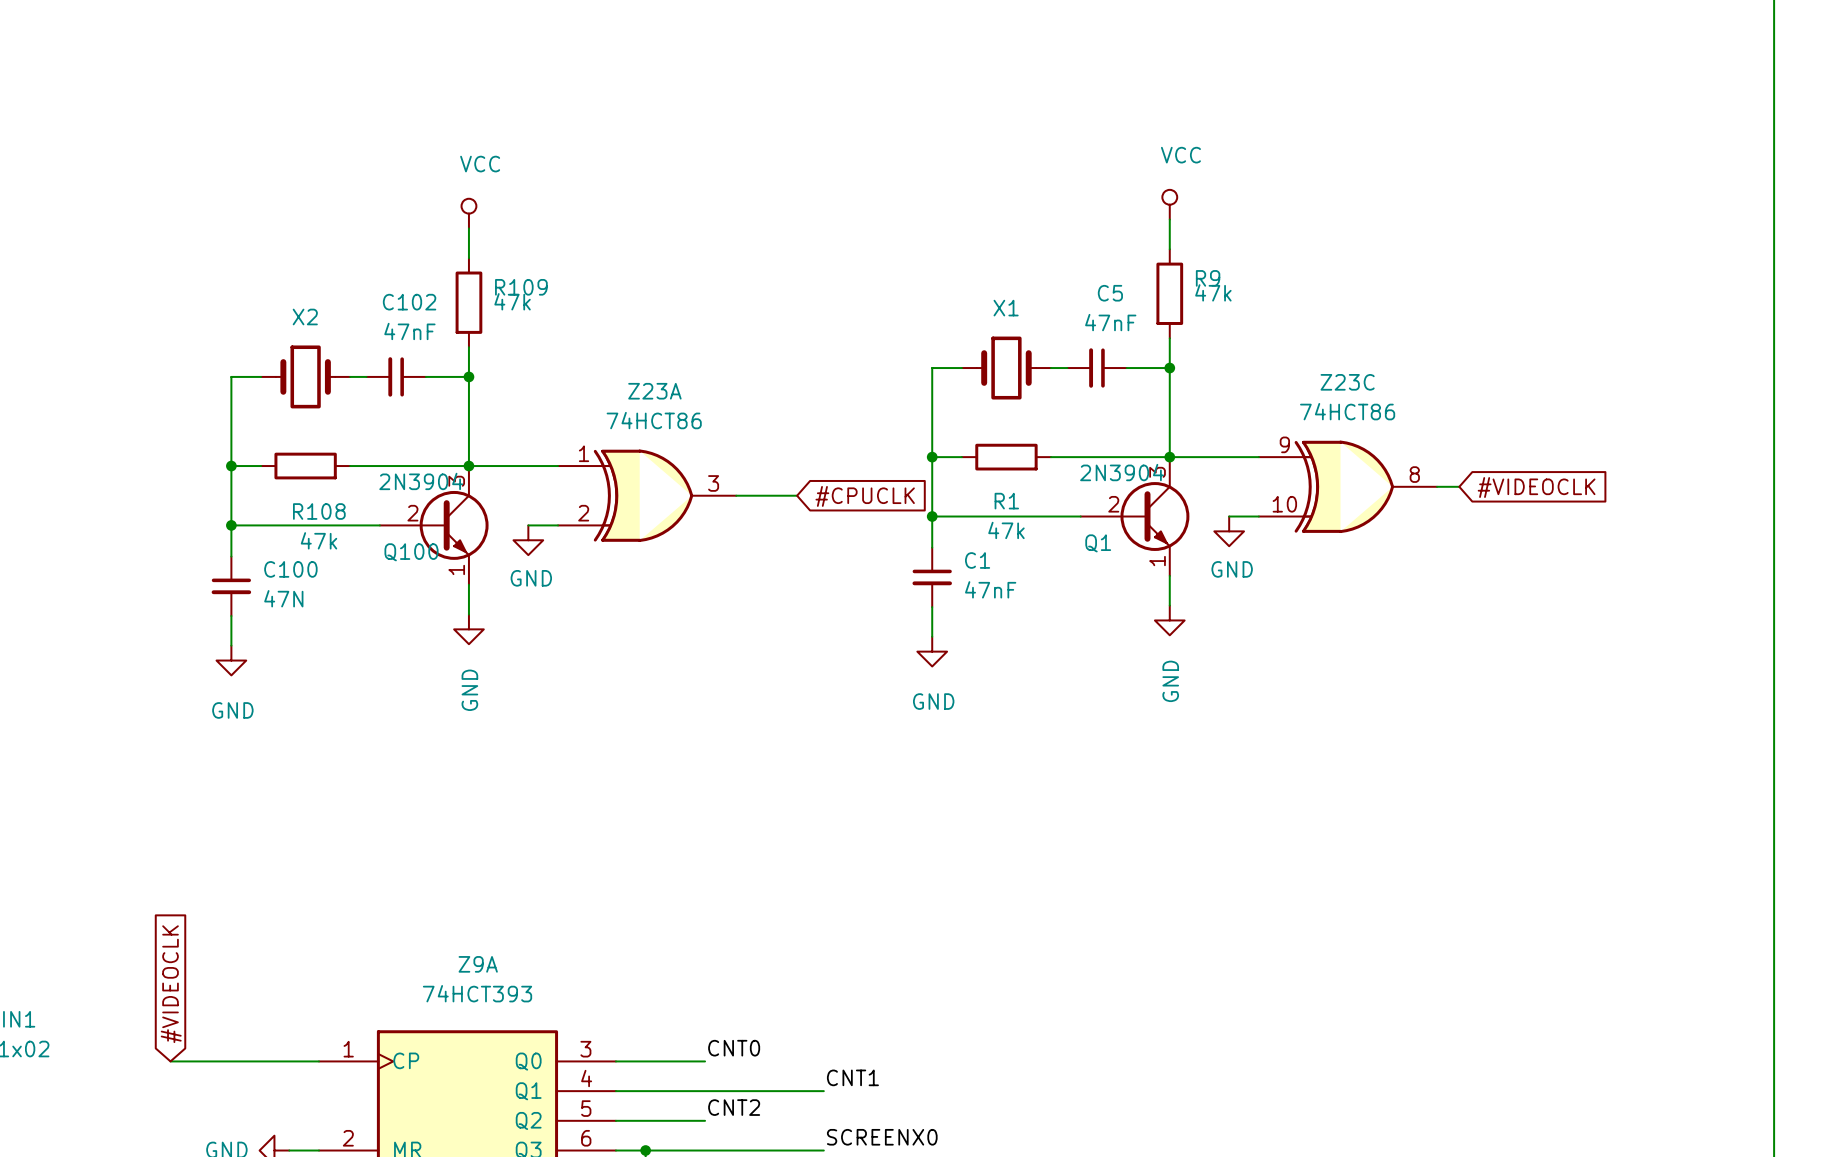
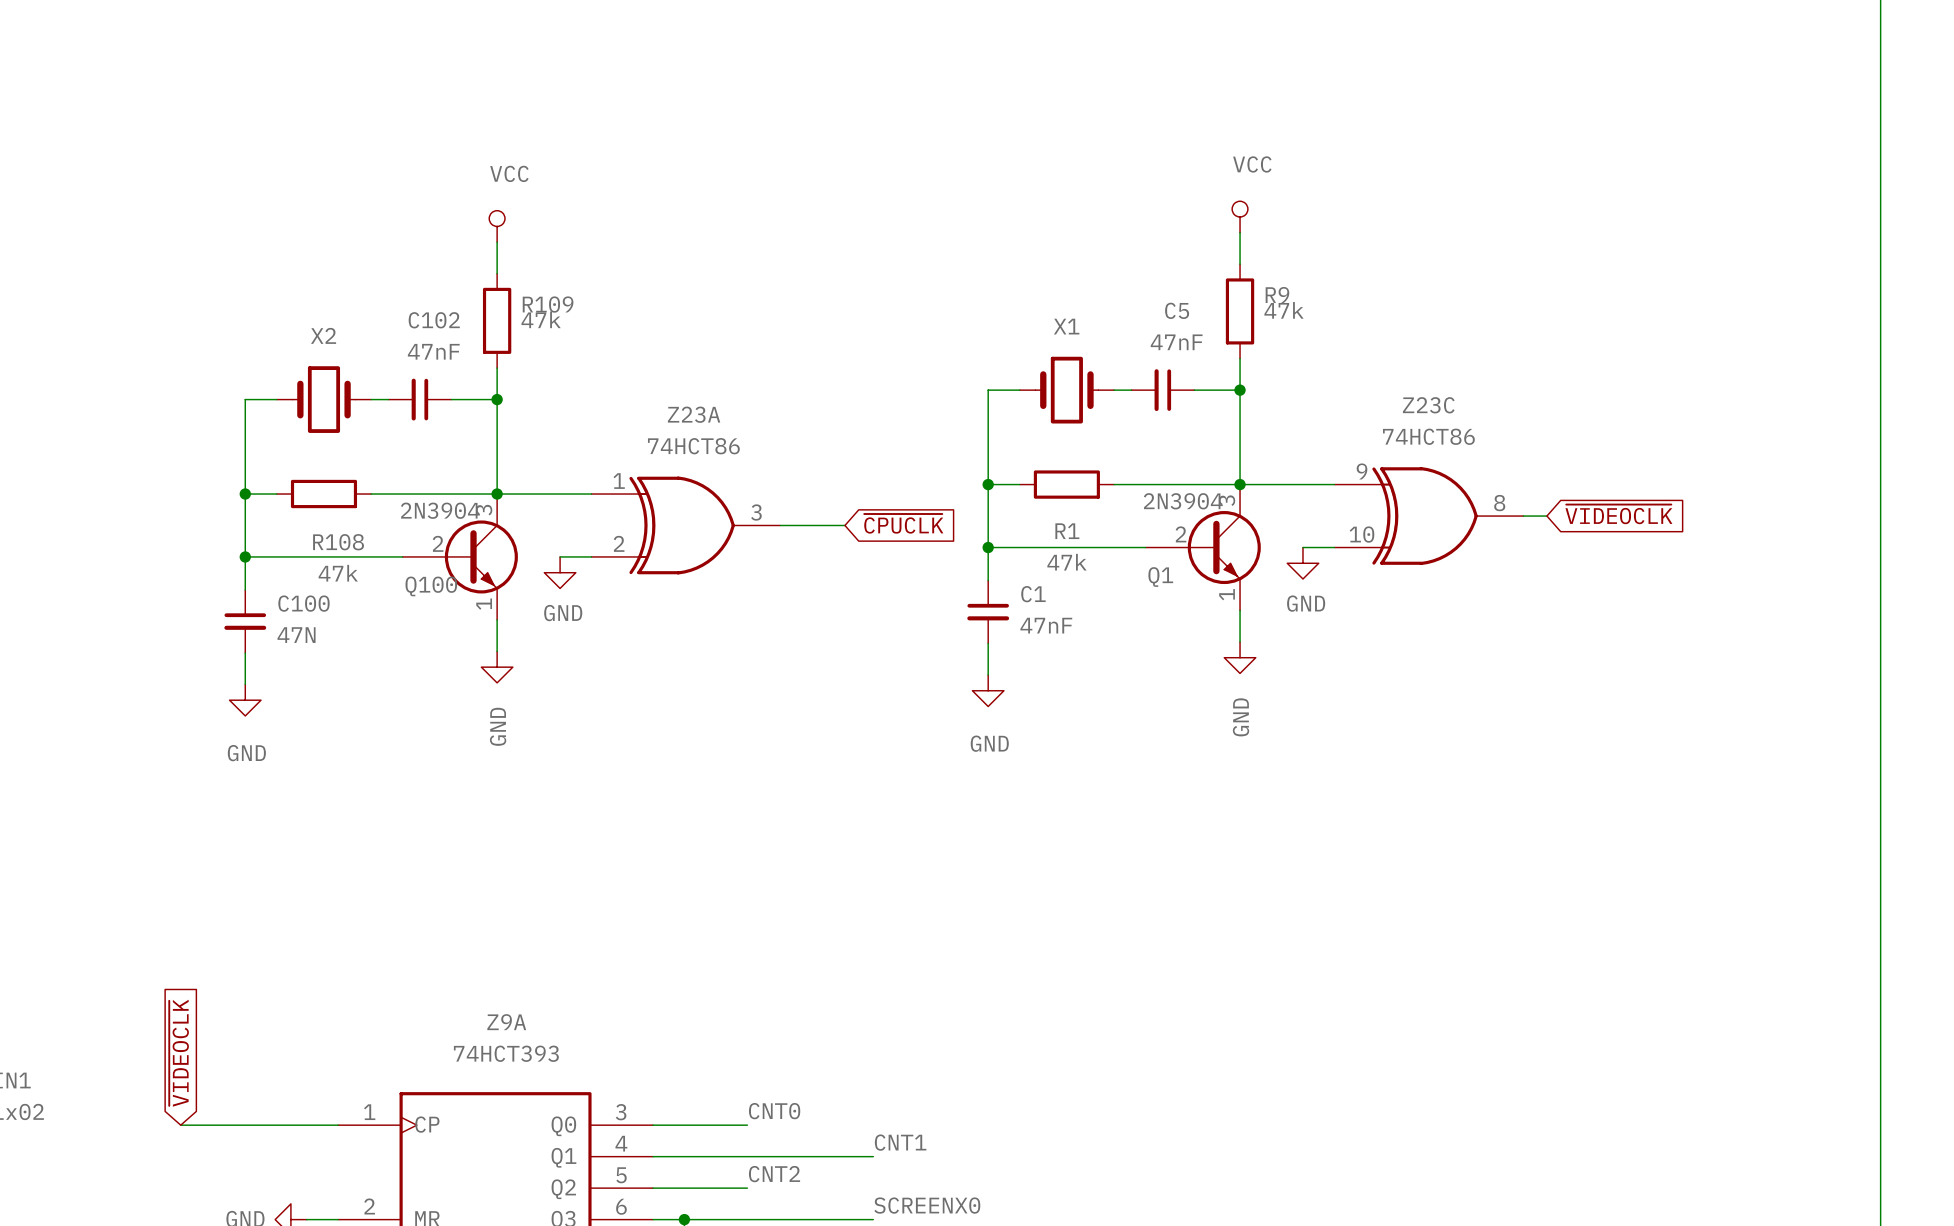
global label: #VIDEOCLK (1536, 487) -> ~{VIDEOCLK} (1618, 514)
global label: #CPUCLK (865, 496) -> ~{CPUCLK} (903, 523)
global label: #VIDEOCLK (171, 984) -> ~{VIDEOCLK} (179, 1053)

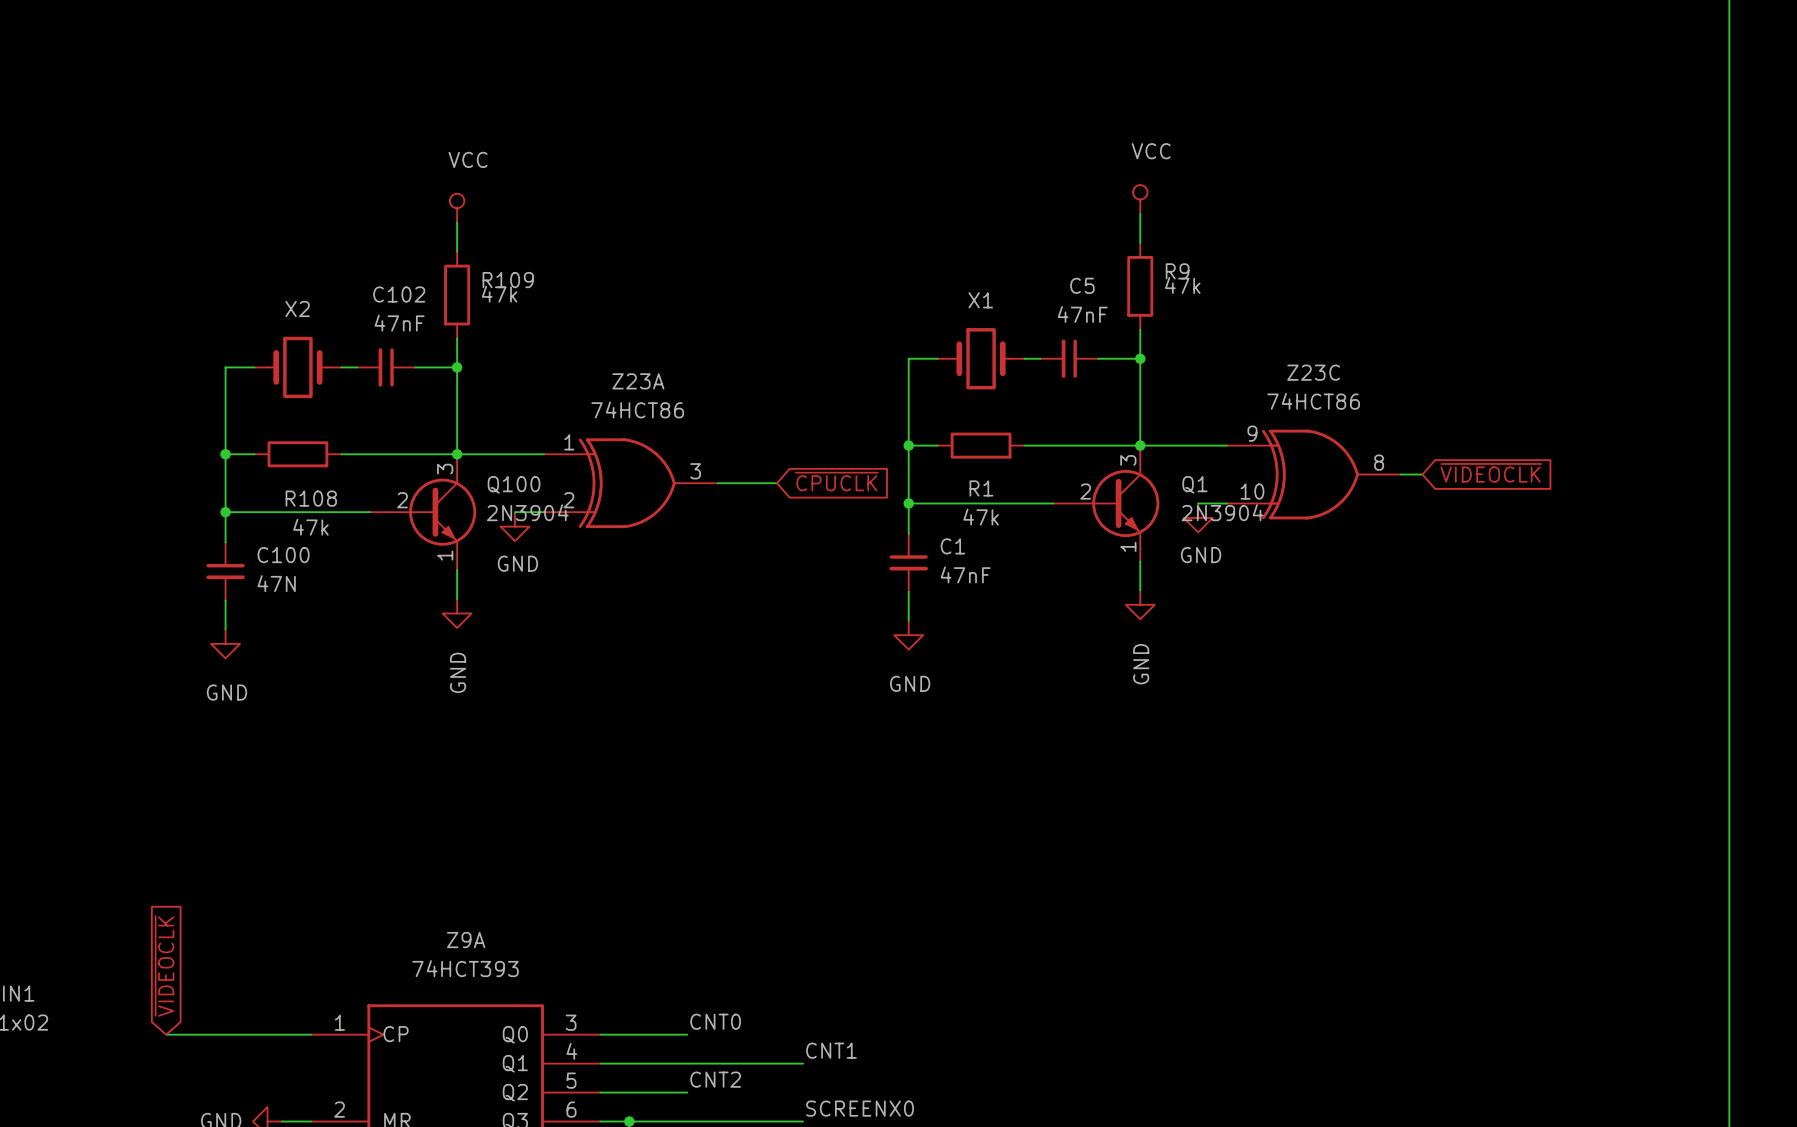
Q1 value position: 2N3904 (1183, 501) -> 2N3904 (1222, 512)
Q100 value position: 2N3904 (440, 510) -> 2N3904 (527, 512)
Q1 name position: Q1 (1160, 576) -> Q1 (1194, 484)
Q100 name position: Q100 (431, 586) -> Q100 (514, 484)

